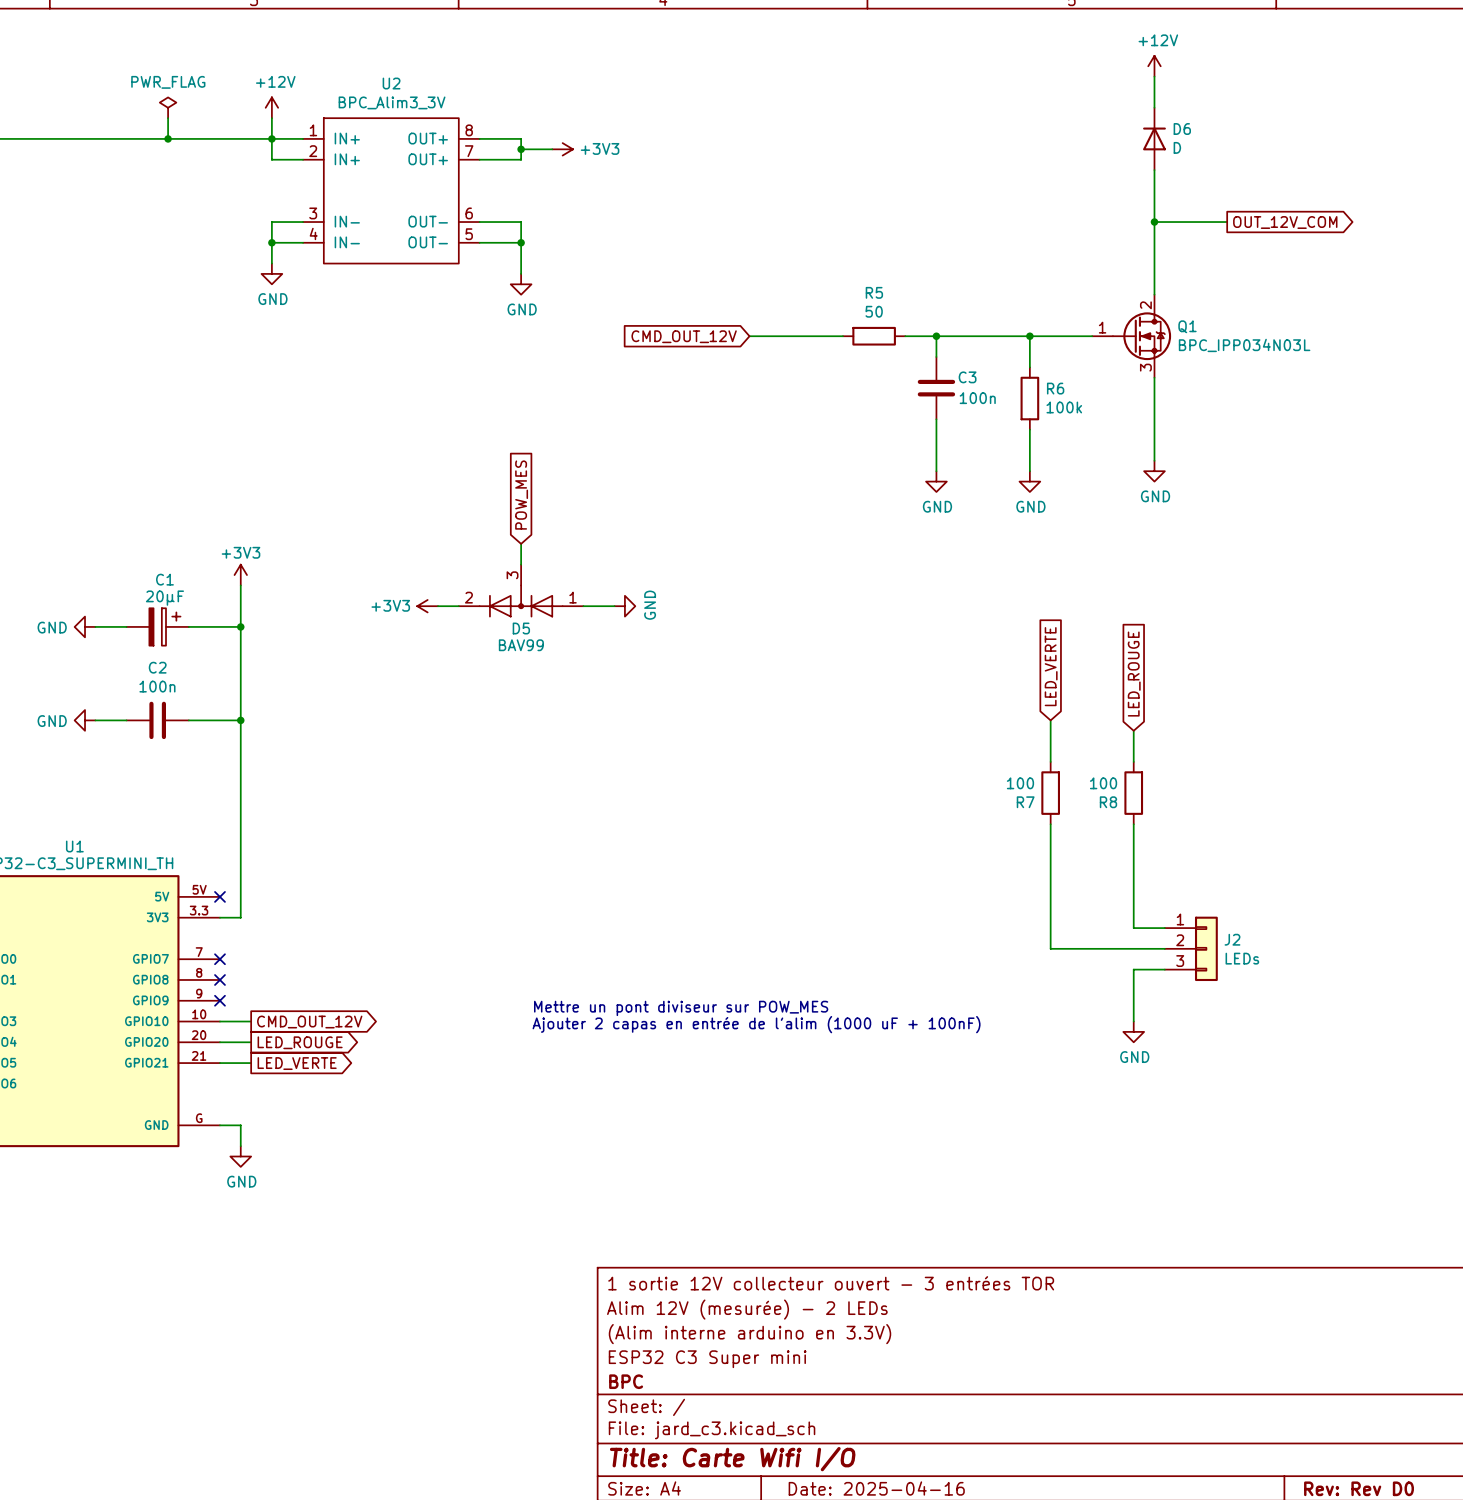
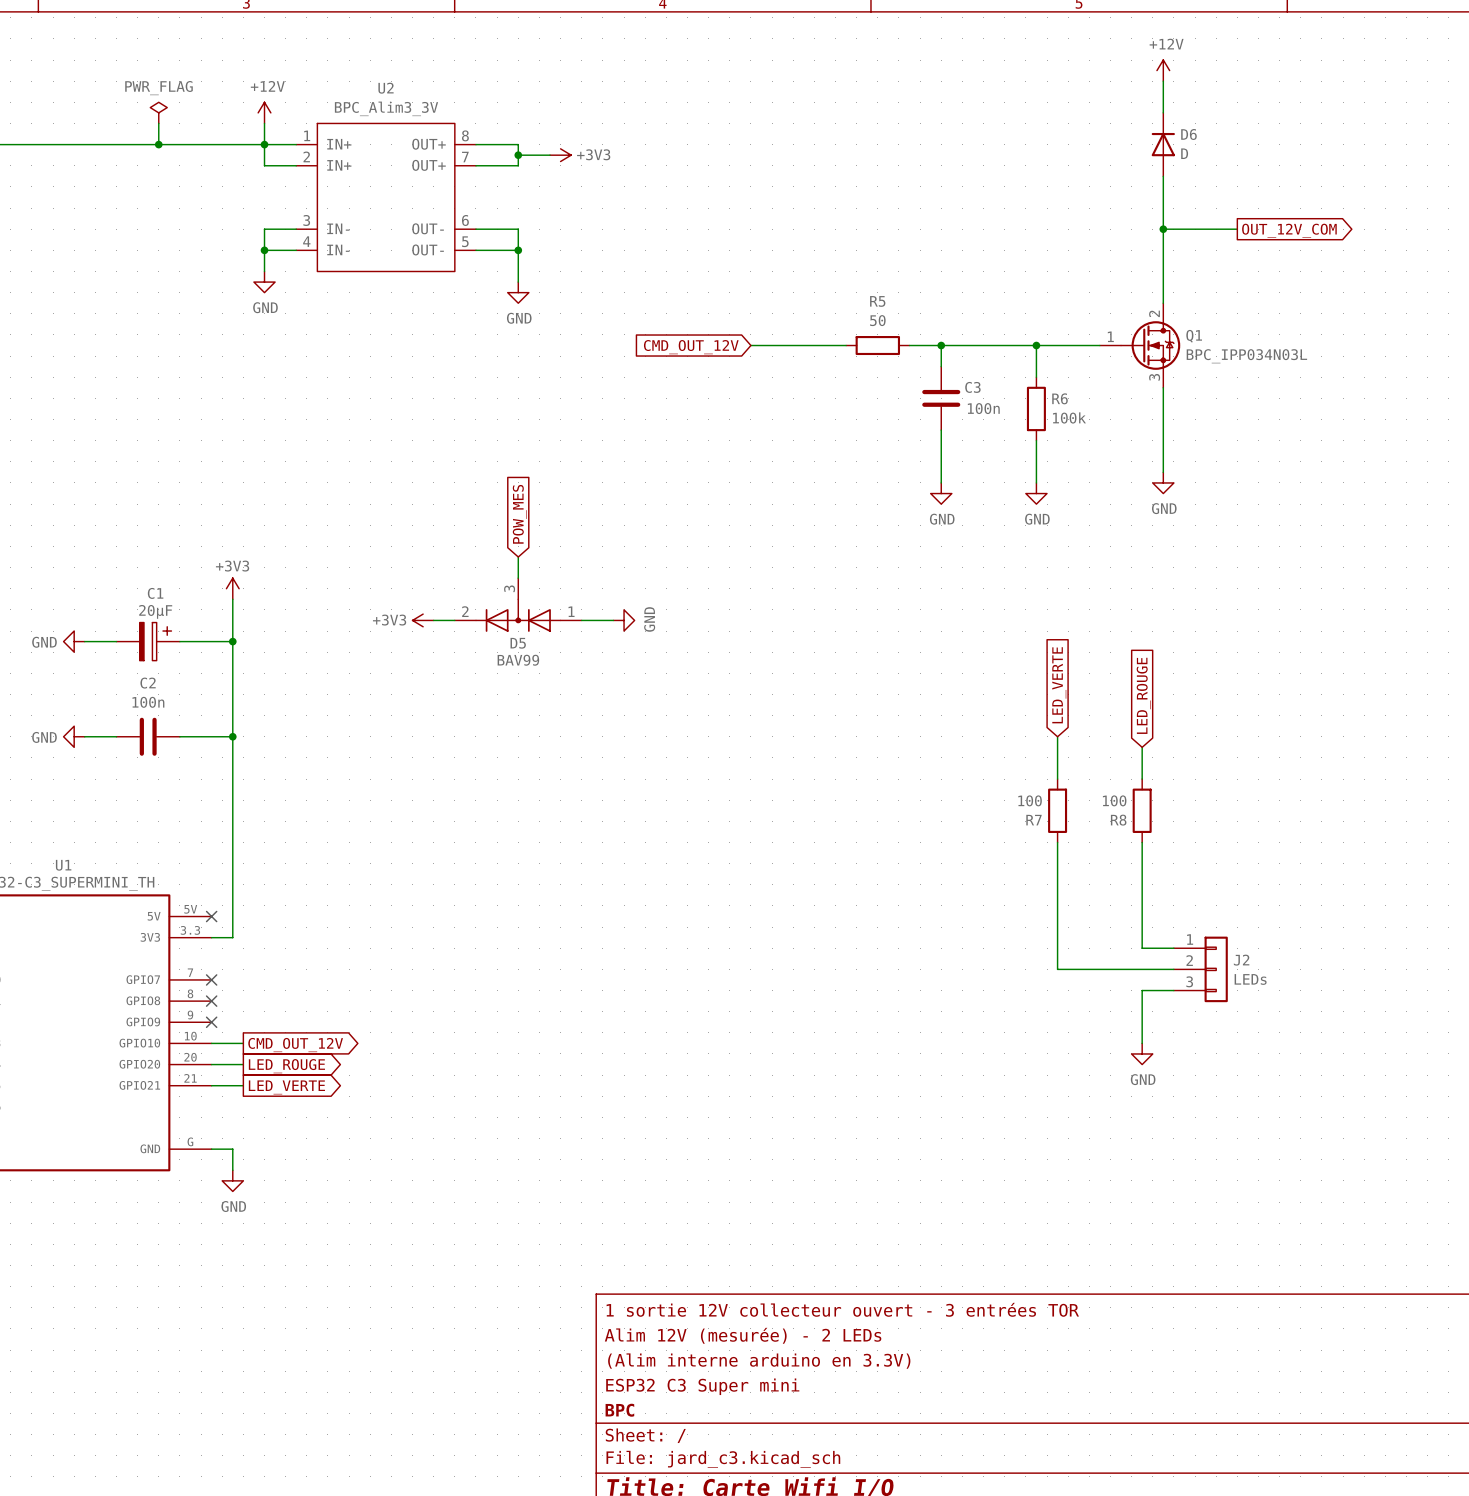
text: Mettre un pont diviseur sur POW_MES (681, 1008) -> none
text: Ajouter 2 capas en entrée de l'alim (1000 uF + 100nF) (756, 1024) -> none

